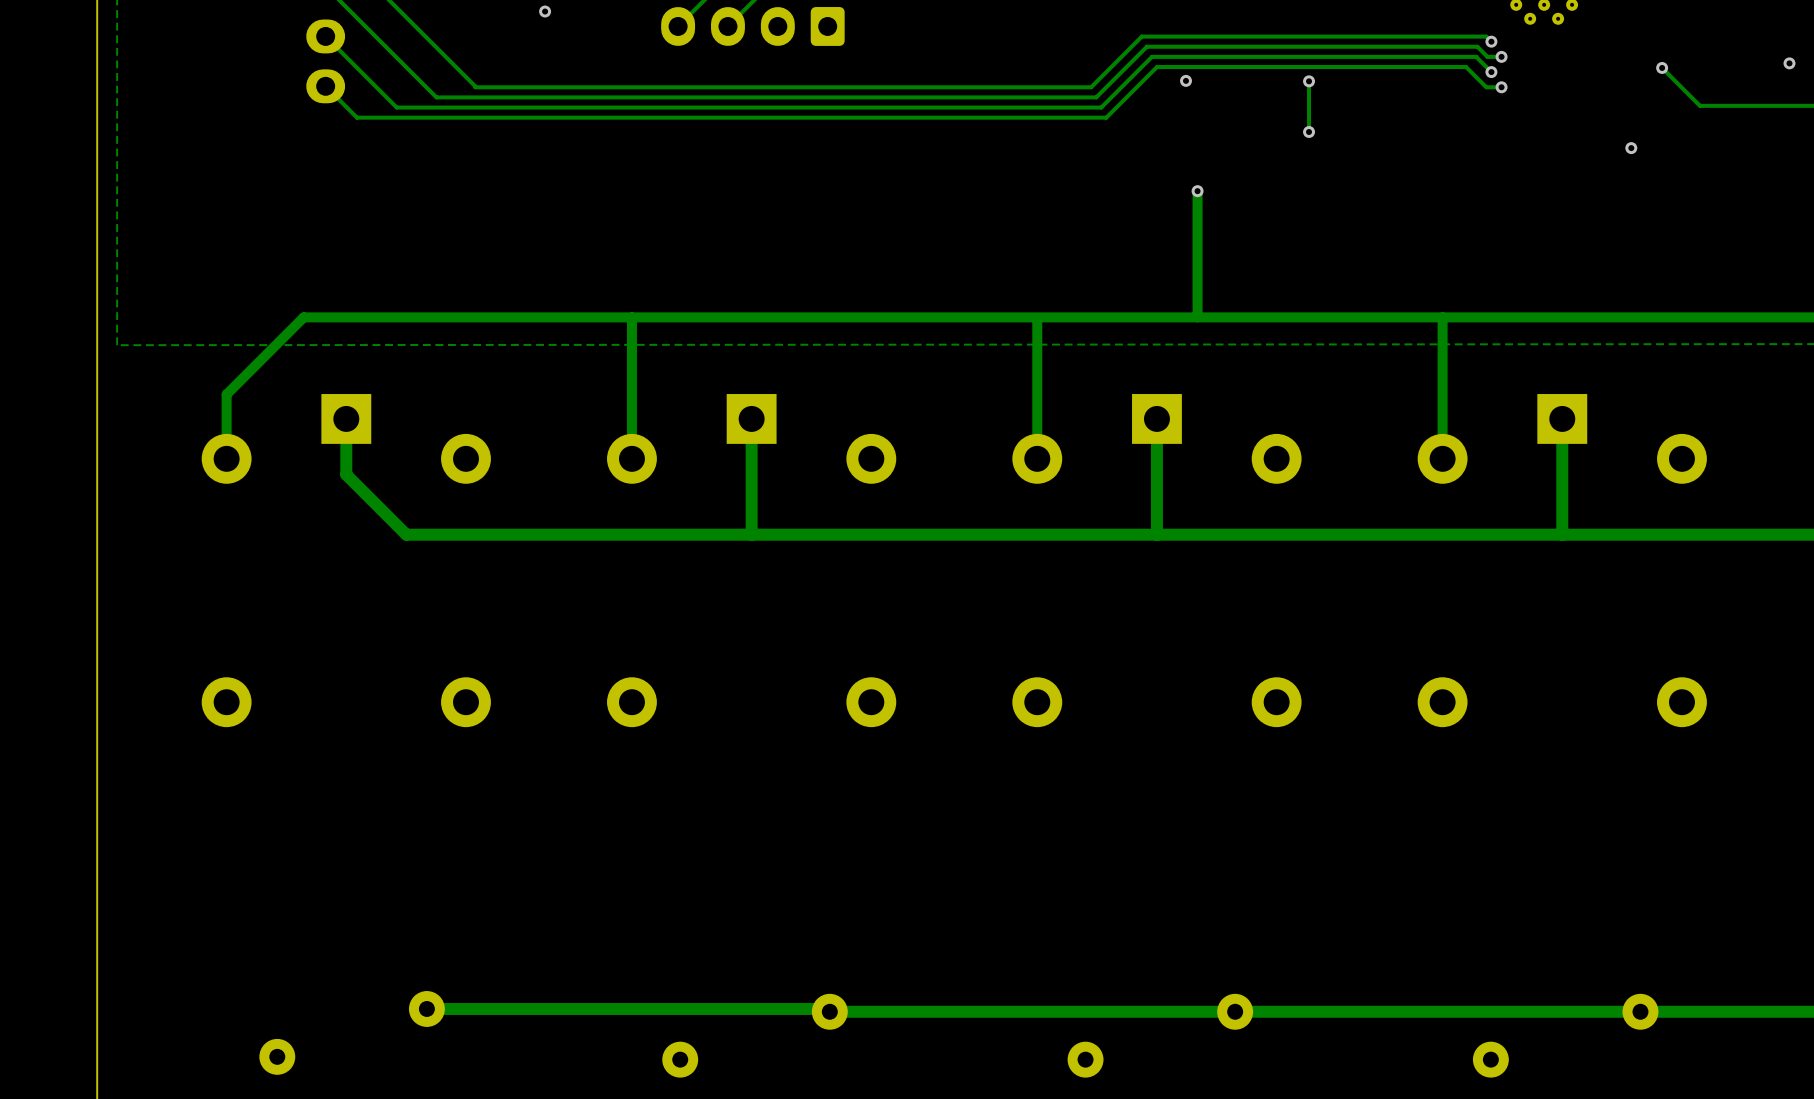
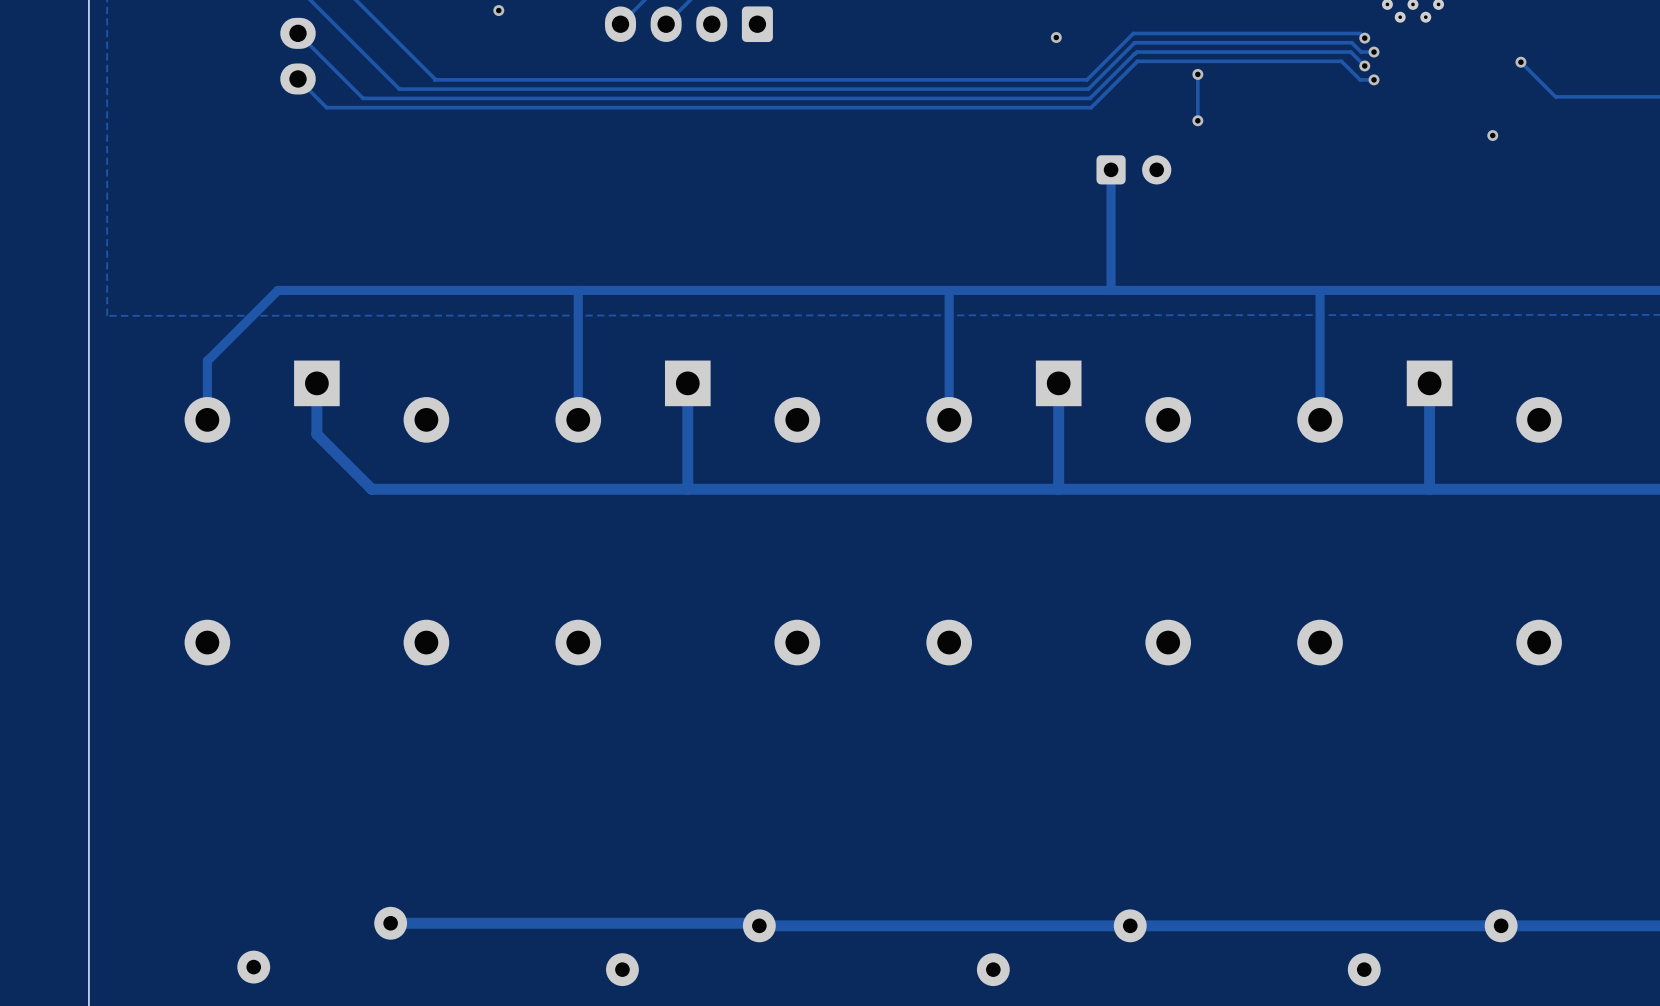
track: (1238, 36) (1141, 36) (1091, 87) -> (1133, 33) (1086, 79) (998, 79)
track: (1240, 46) (1146, 46) (1096, 97) -> (1134, 42) (1088, 89) (1003, 89)
track: (1242, 56) (1151, 56) (1101, 107) -> (1136, 52) (1090, 98) (1007, 98)
via: (1789, 63) -> none
track: (1243, 67) (1157, 67) (1106, 117) -> (1137, 61) (1091, 107) (1012, 107)
via position: (1185, 80) -> (1056, 37)
track: none -> (1111, 169) (1111, 290)
part: none -> (1133, 169)
track: (1197, 191) (1197, 317) -> none
via: (1197, 191) -> none

